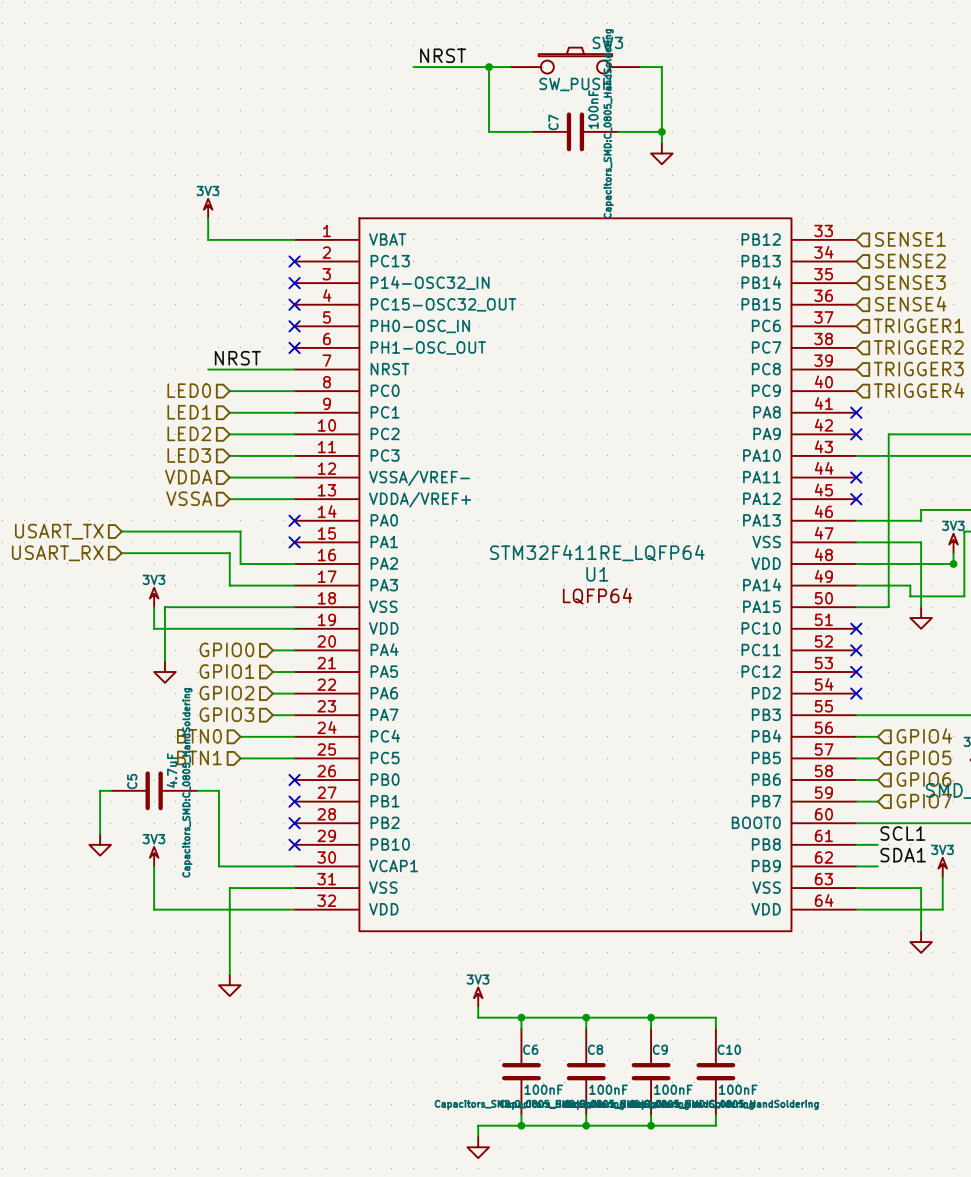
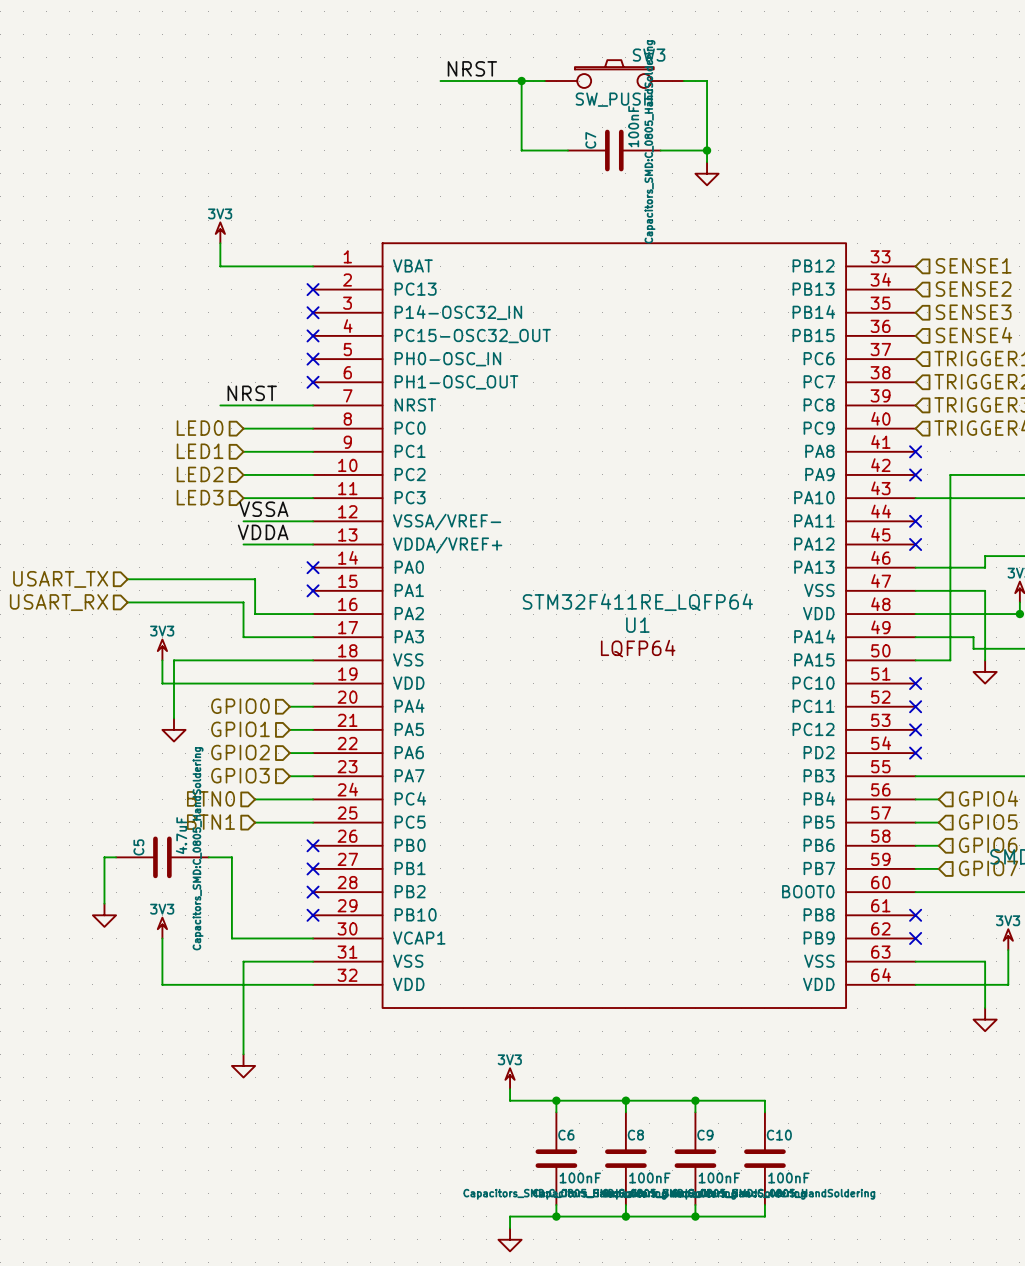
label: none -> VSSA (263, 509)
hierarchical label: VDDA (188, 477) -> none
label: none -> VDDA (263, 532)
hierarchical label: VSSA (189, 498) -> none
label: SCL1 (902, 833) -> none
wire: (856, 844) (877, 844) -> none
no-connect mark: none -> (915, 915)
label: SDA1 (903, 855) -> none
wire: (856, 866) (877, 866) -> none
no-connect mark: none -> (915, 938)

